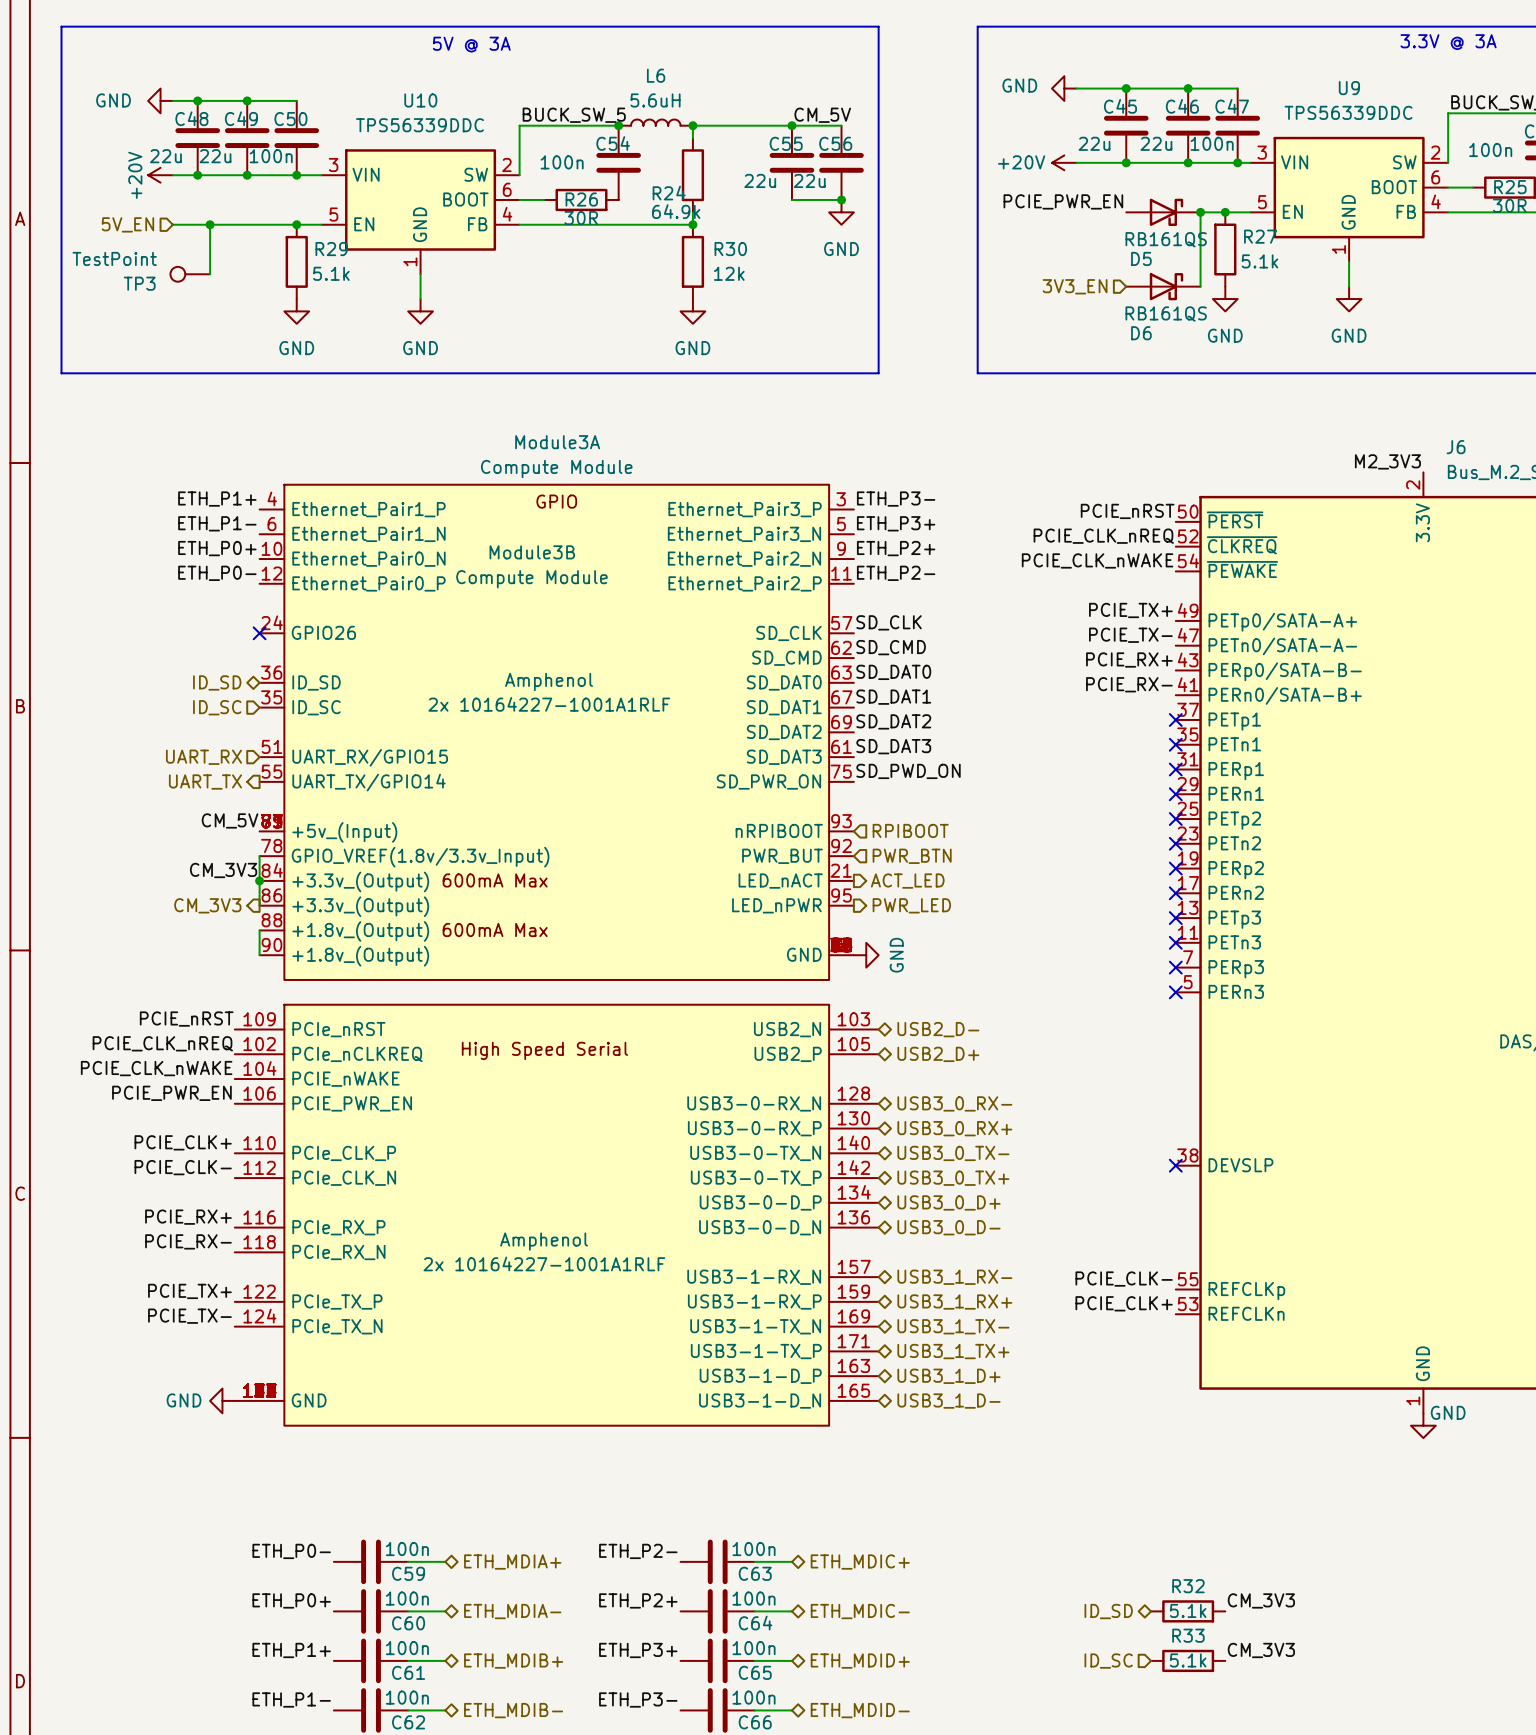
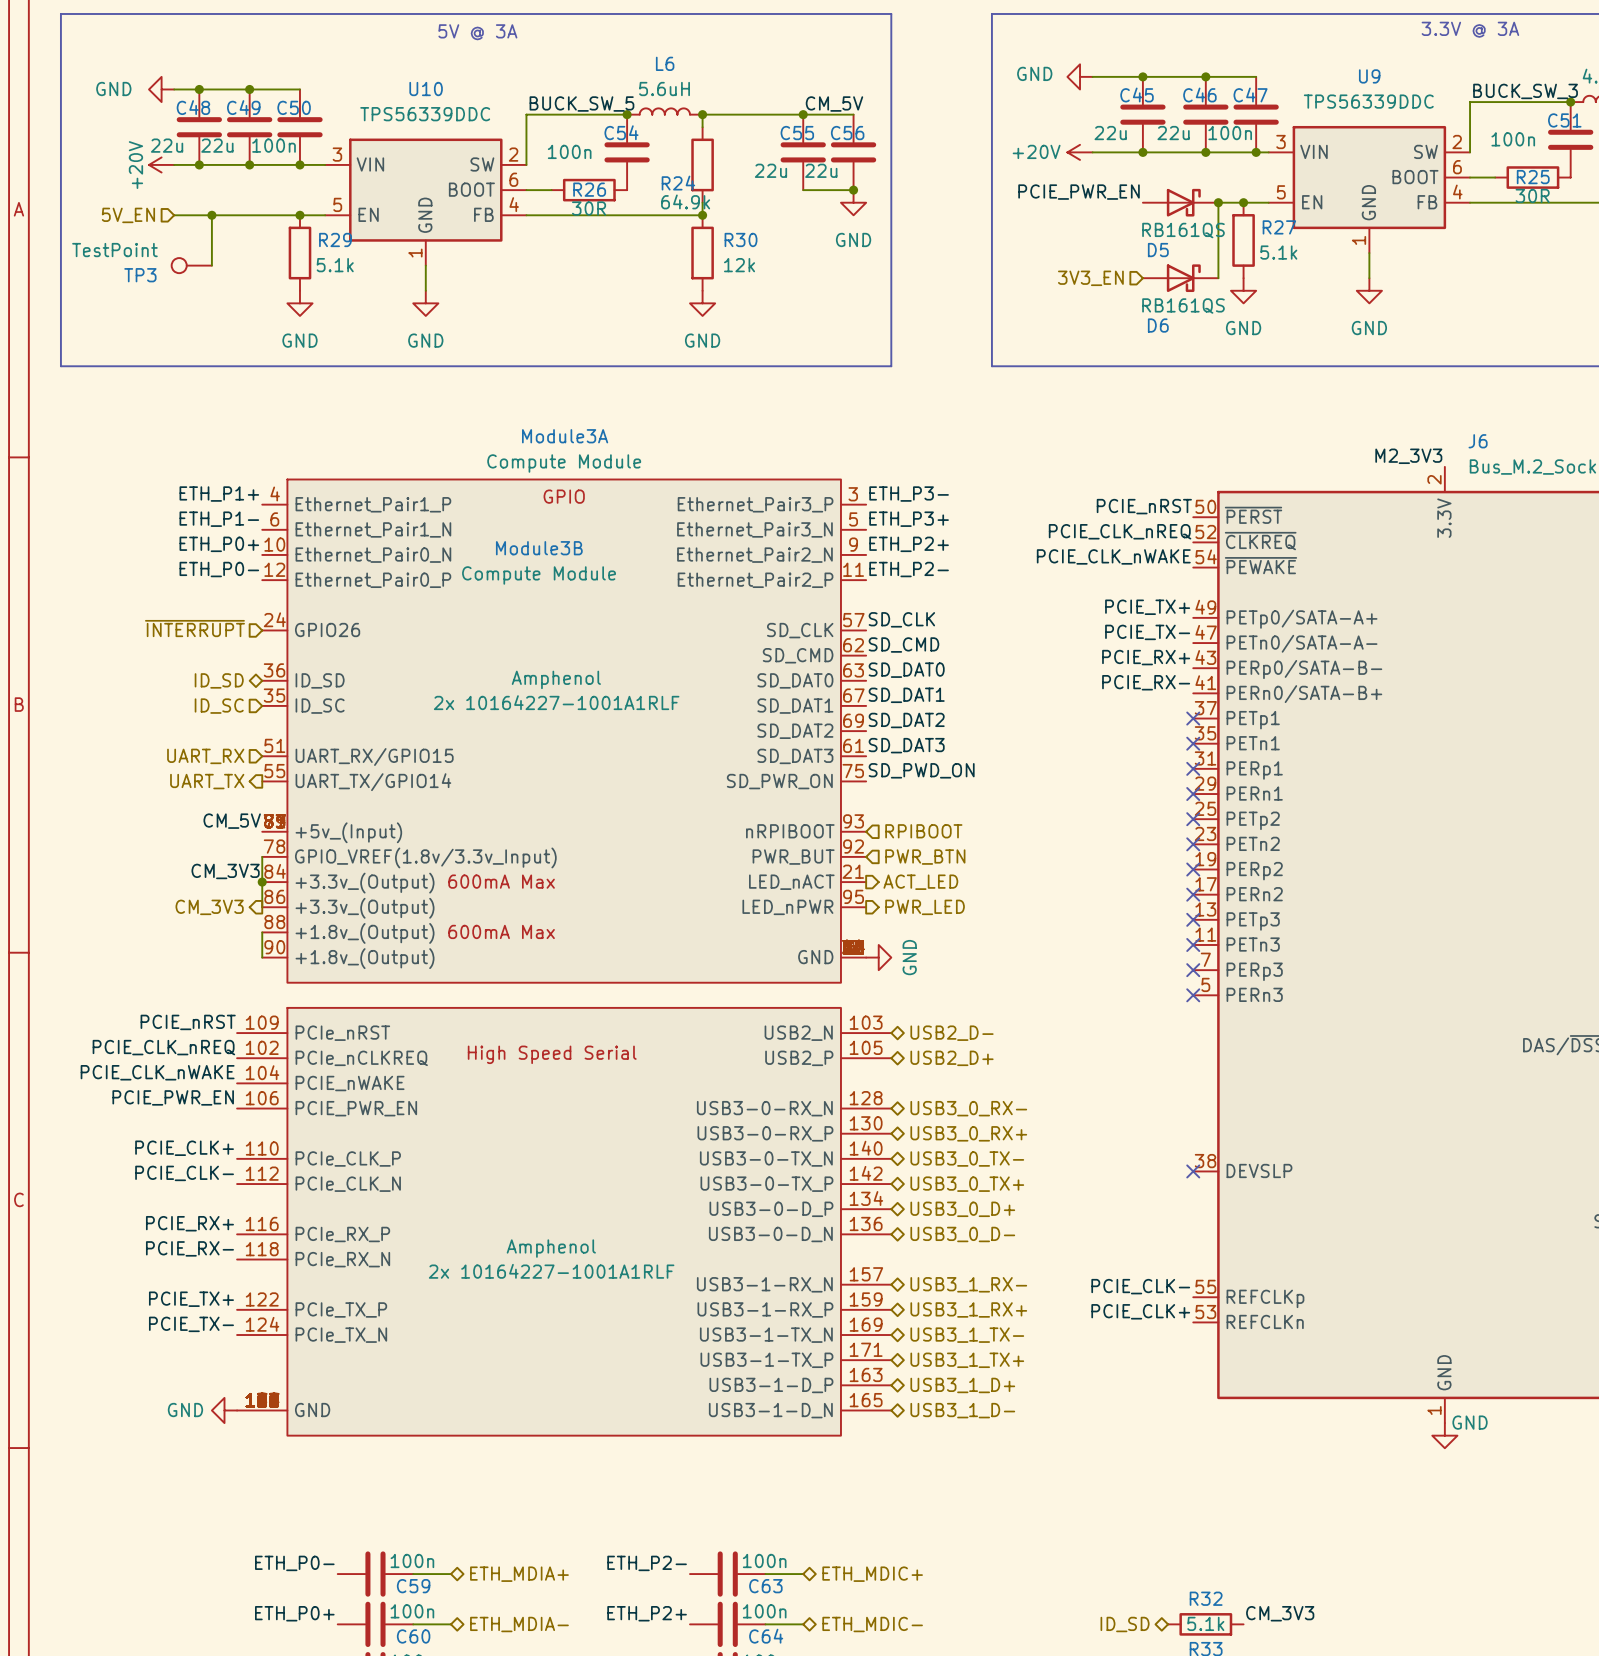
hierarchical label: none -> ~{INTERRUPT} (194, 628)
no-connect mark: (259, 633) -> none

